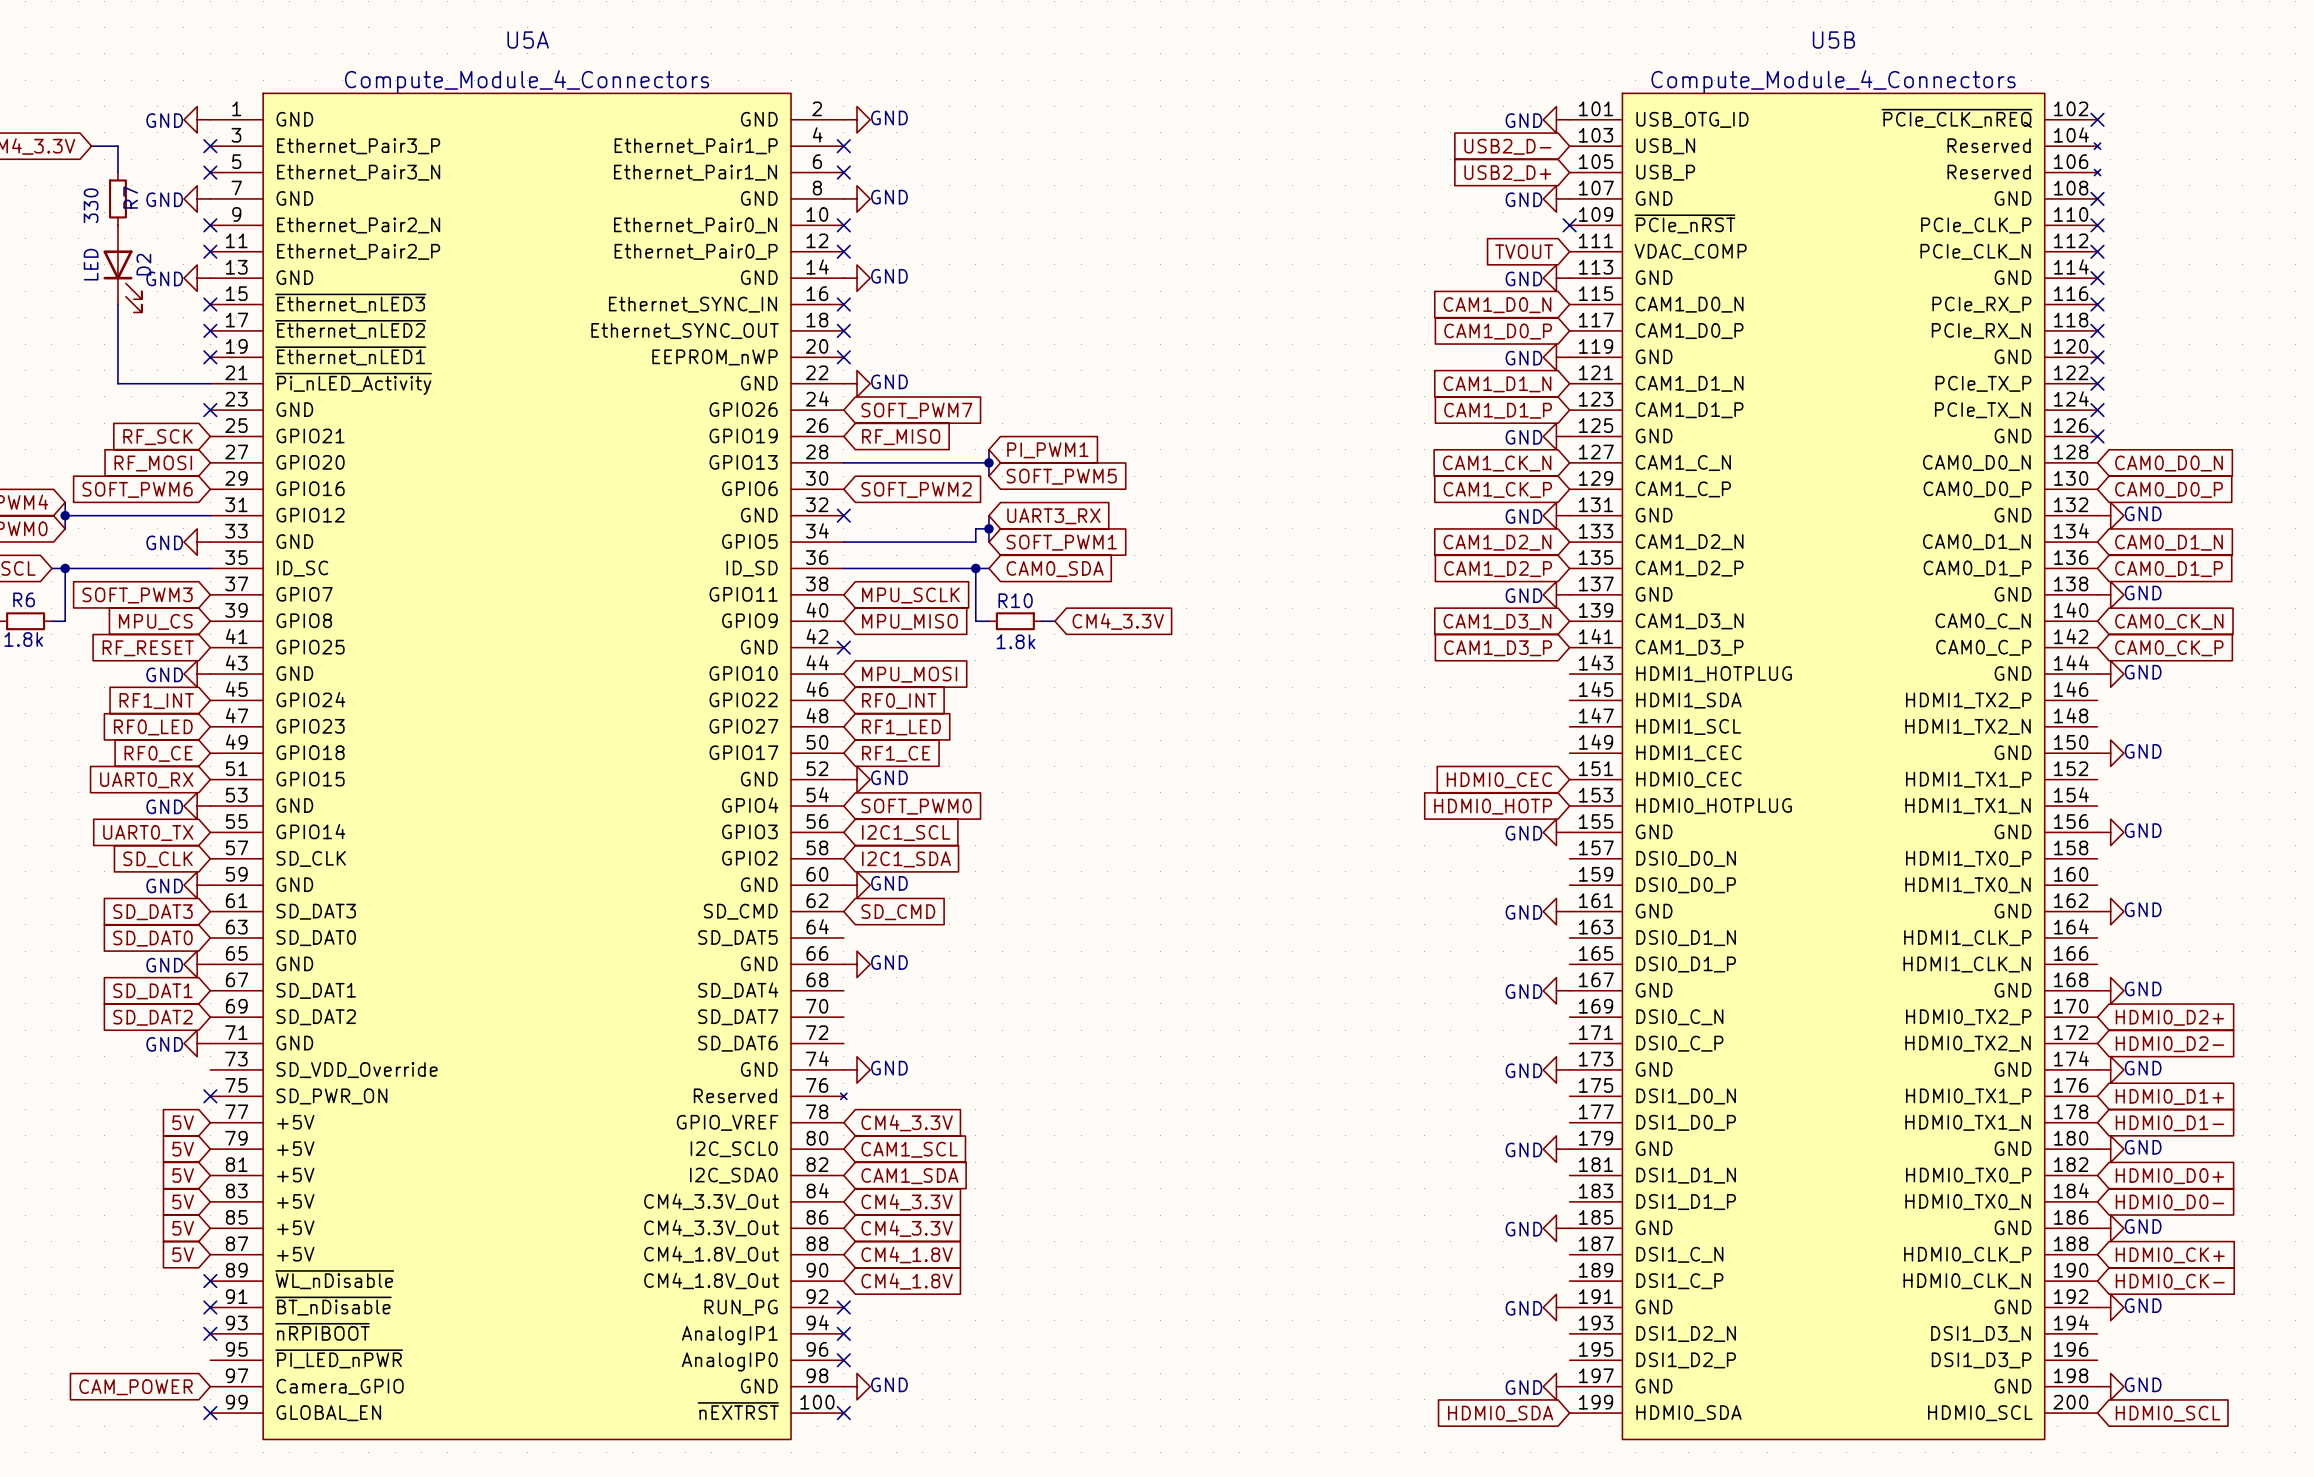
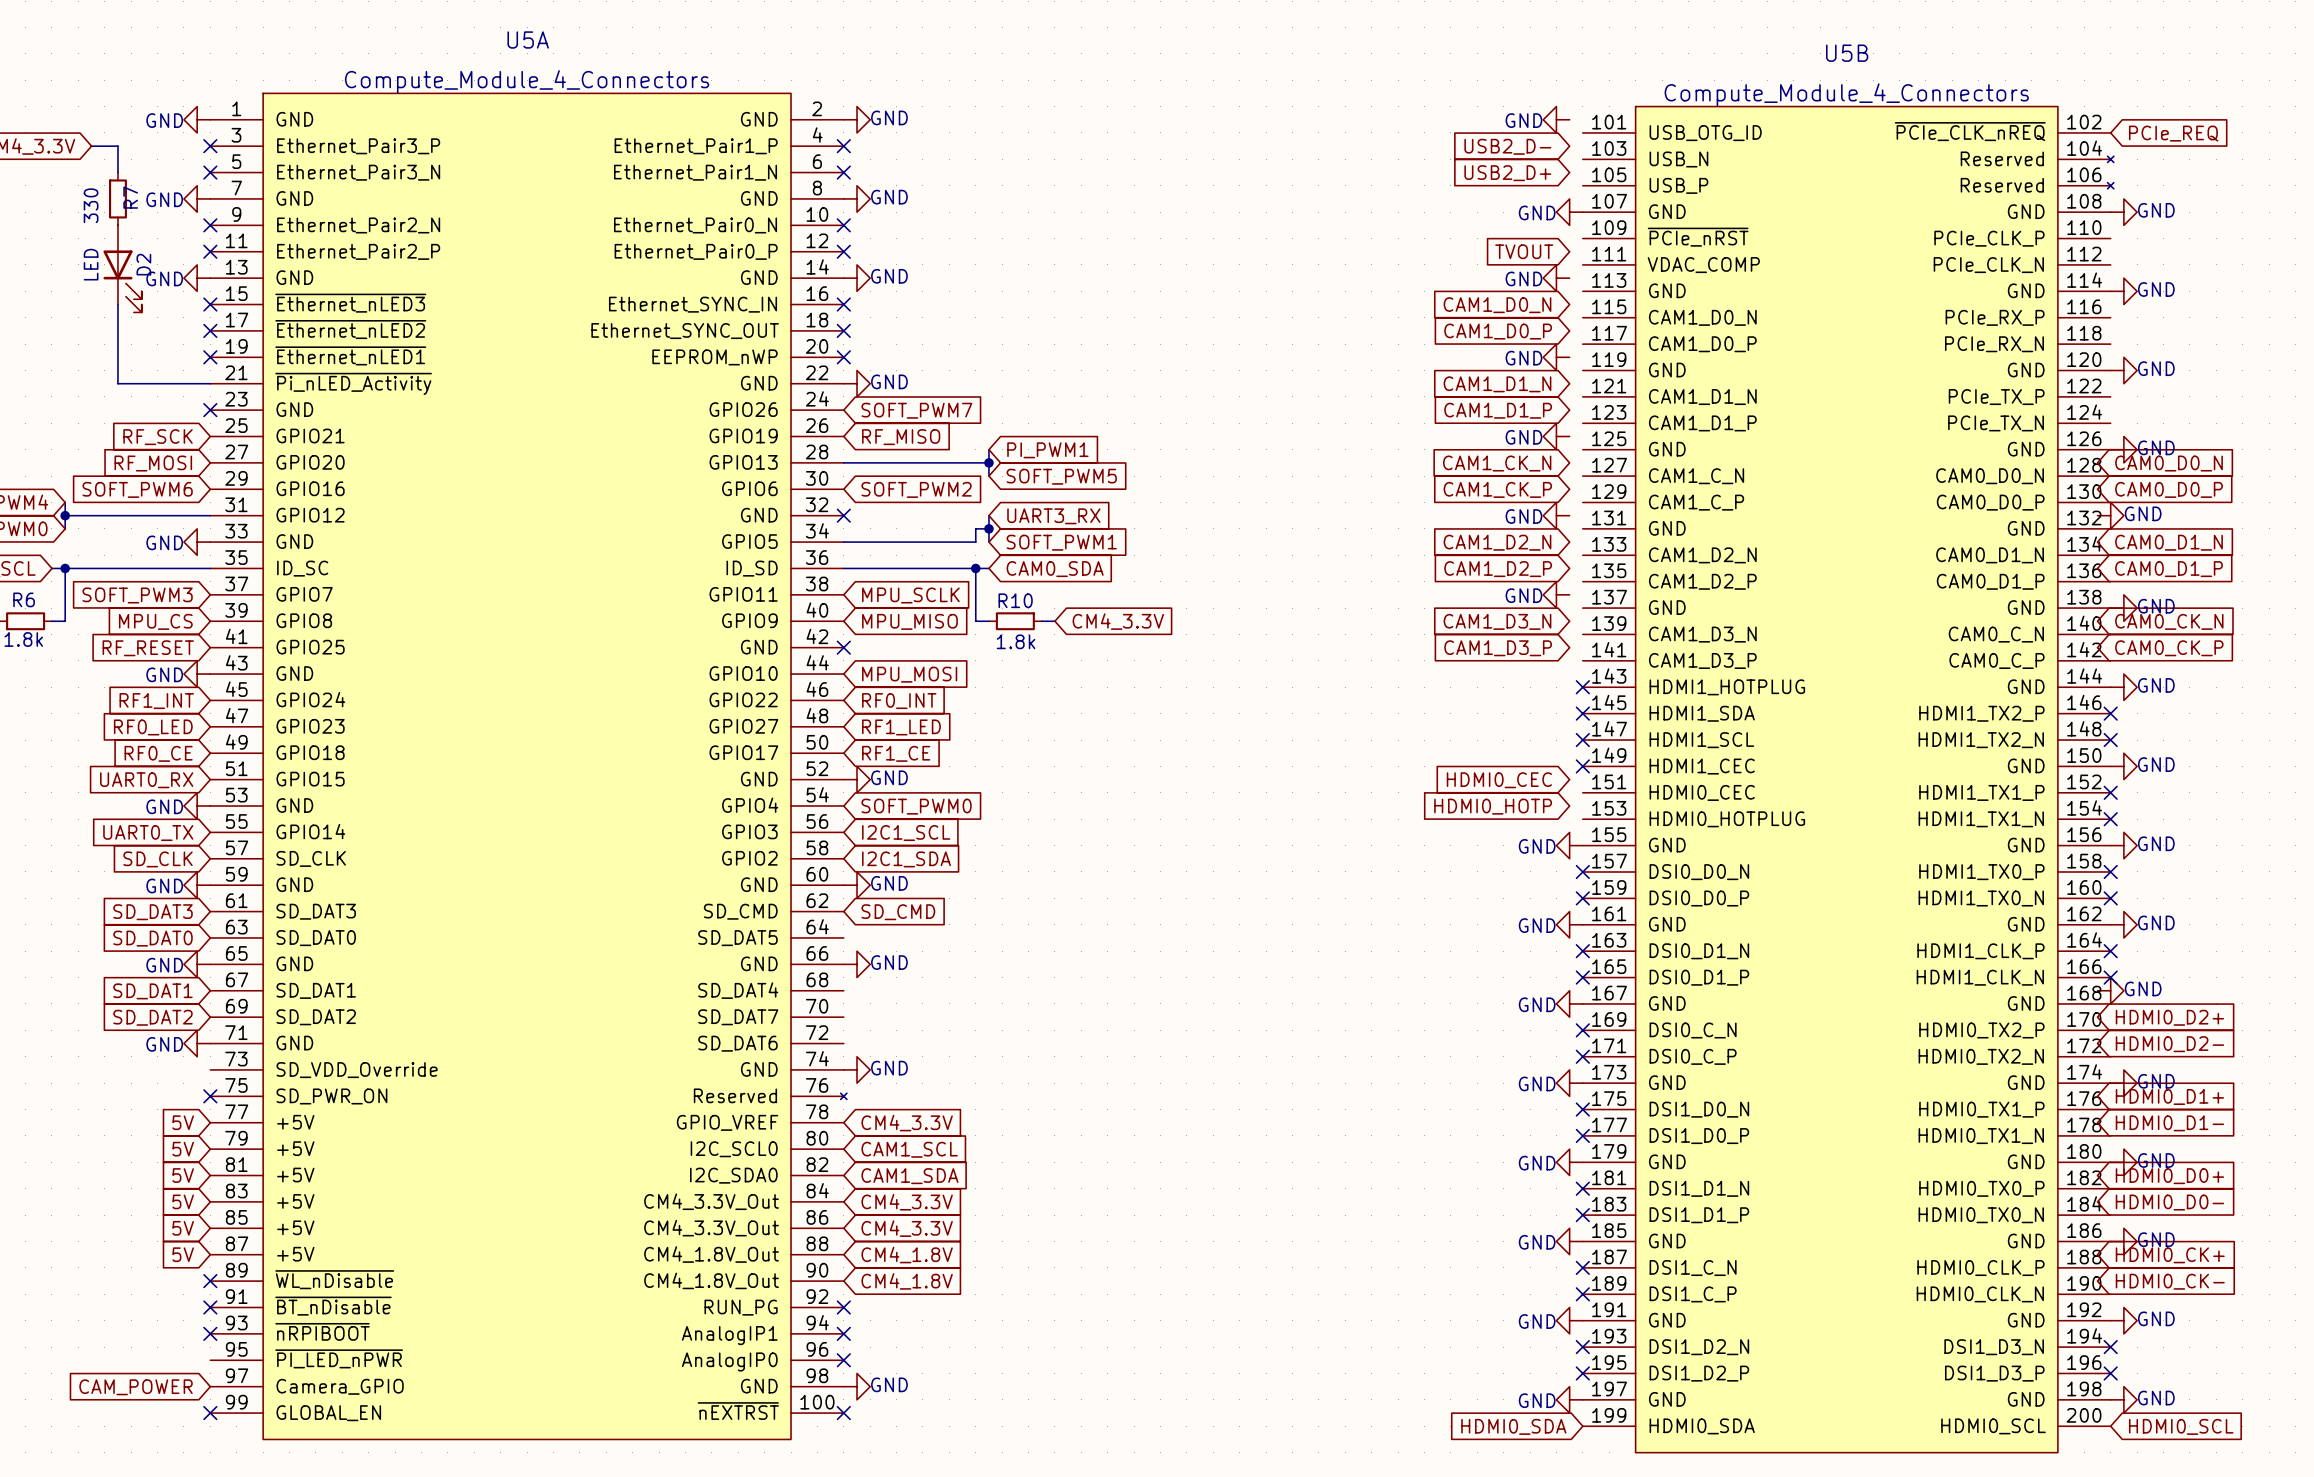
no-connect mark: (2097, 119) -> none
global label: none -> PCIe_REQ (2173, 133)
power symbol position: GND (1556, 198) -> GND (1569, 212)
no-connect mark: (2097, 198) -> none
power symbol: none -> GND (2123, 212)
no-connect mark: (1569, 225) -> none
no-connect mark: (2097, 225) -> none
no-connect mark: (2097, 251) -> none
no-connect mark: (2097, 278) -> none
power symbol: none -> GND (2123, 291)
no-connect mark: (2097, 304) -> none
no-connect mark: (2097, 330) -> none
no-connect mark: (2097, 357) -> none
power symbol: none -> GND (2123, 370)
no-connect mark: (2097, 383) -> none
no-connect mark: (2097, 410) -> none
no-connect mark: (2097, 436) -> none
power symbol: none -> GND (2123, 449)
power symbol position: GND (2110, 594) -> GND (2123, 608)
power symbol position: GND (2110, 674) -> GND (2123, 687)
no-connect mark: none -> (1582, 687)
no-connect mark: none -> (1582, 713)
no-connect mark: none -> (2110, 713)
no-connect mark: none -> (1582, 740)
no-connect mark: none -> (2110, 740)
power symbol position: GND (2110, 753) -> GND (2123, 766)
no-connect mark: none -> (1582, 766)
U5B position: (1835, 766) -> (1848, 779)
no-connect mark: none -> (2110, 792)
no-connect mark: none -> (2110, 819)
power symbol position: GND (1556, 832) -> GND (1569, 845)
power symbol position: GND (2110, 832) -> GND (2123, 845)
no-connect mark: none -> (1582, 871)
no-connect mark: none -> (2110, 871)
no-connect mark: none -> (1582, 898)
no-connect mark: none -> (2110, 898)
power symbol position: GND (1556, 911) -> GND (1569, 924)
power symbol position: GND (2110, 911) -> GND (2123, 924)
no-connect mark: none -> (1582, 951)
no-connect mark: none -> (2110, 951)
no-connect mark: none -> (1582, 977)
no-connect mark: none -> (2110, 977)
power symbol position: GND (1556, 990) -> GND (1569, 1003)
no-connect mark: none -> (1582, 1030)
no-connect mark: none -> (1582, 1056)
power symbol position: GND (1556, 1069) -> GND (1569, 1083)
power symbol position: GND (2110, 1069) -> GND (2123, 1083)
no-connect mark: none -> (1582, 1109)
no-connect mark: none -> (1582, 1135)
power symbol position: GND (1556, 1149) -> GND (1569, 1162)
power symbol position: GND (2110, 1149) -> GND (2123, 1162)
no-connect mark: none -> (1582, 1188)
no-connect mark: none -> (1582, 1215)
power symbol position: GND (1556, 1228) -> GND (1569, 1241)
power symbol position: GND (2110, 1228) -> GND (2123, 1241)
no-connect mark: none -> (1582, 1267)
no-connect mark: none -> (1582, 1294)
power symbol position: GND (1556, 1307) -> GND (1569, 1320)
power symbol position: GND (2110, 1307) -> GND (2123, 1320)
no-connect mark: none -> (1582, 1347)
no-connect mark: none -> (2110, 1347)
no-connect mark: none -> (1582, 1373)
no-connect mark: none -> (2110, 1373)
power symbol position: GND (1556, 1386) -> GND (1569, 1399)
power symbol position: GND (2110, 1386) -> GND (2123, 1399)
global label position: HDMI0_SDA (1500, 1413) -> HDMI0_SDA (1513, 1426)
global label position: HDMI0_SCL (2168, 1413) -> HDMI0_SCL (2181, 1426)

